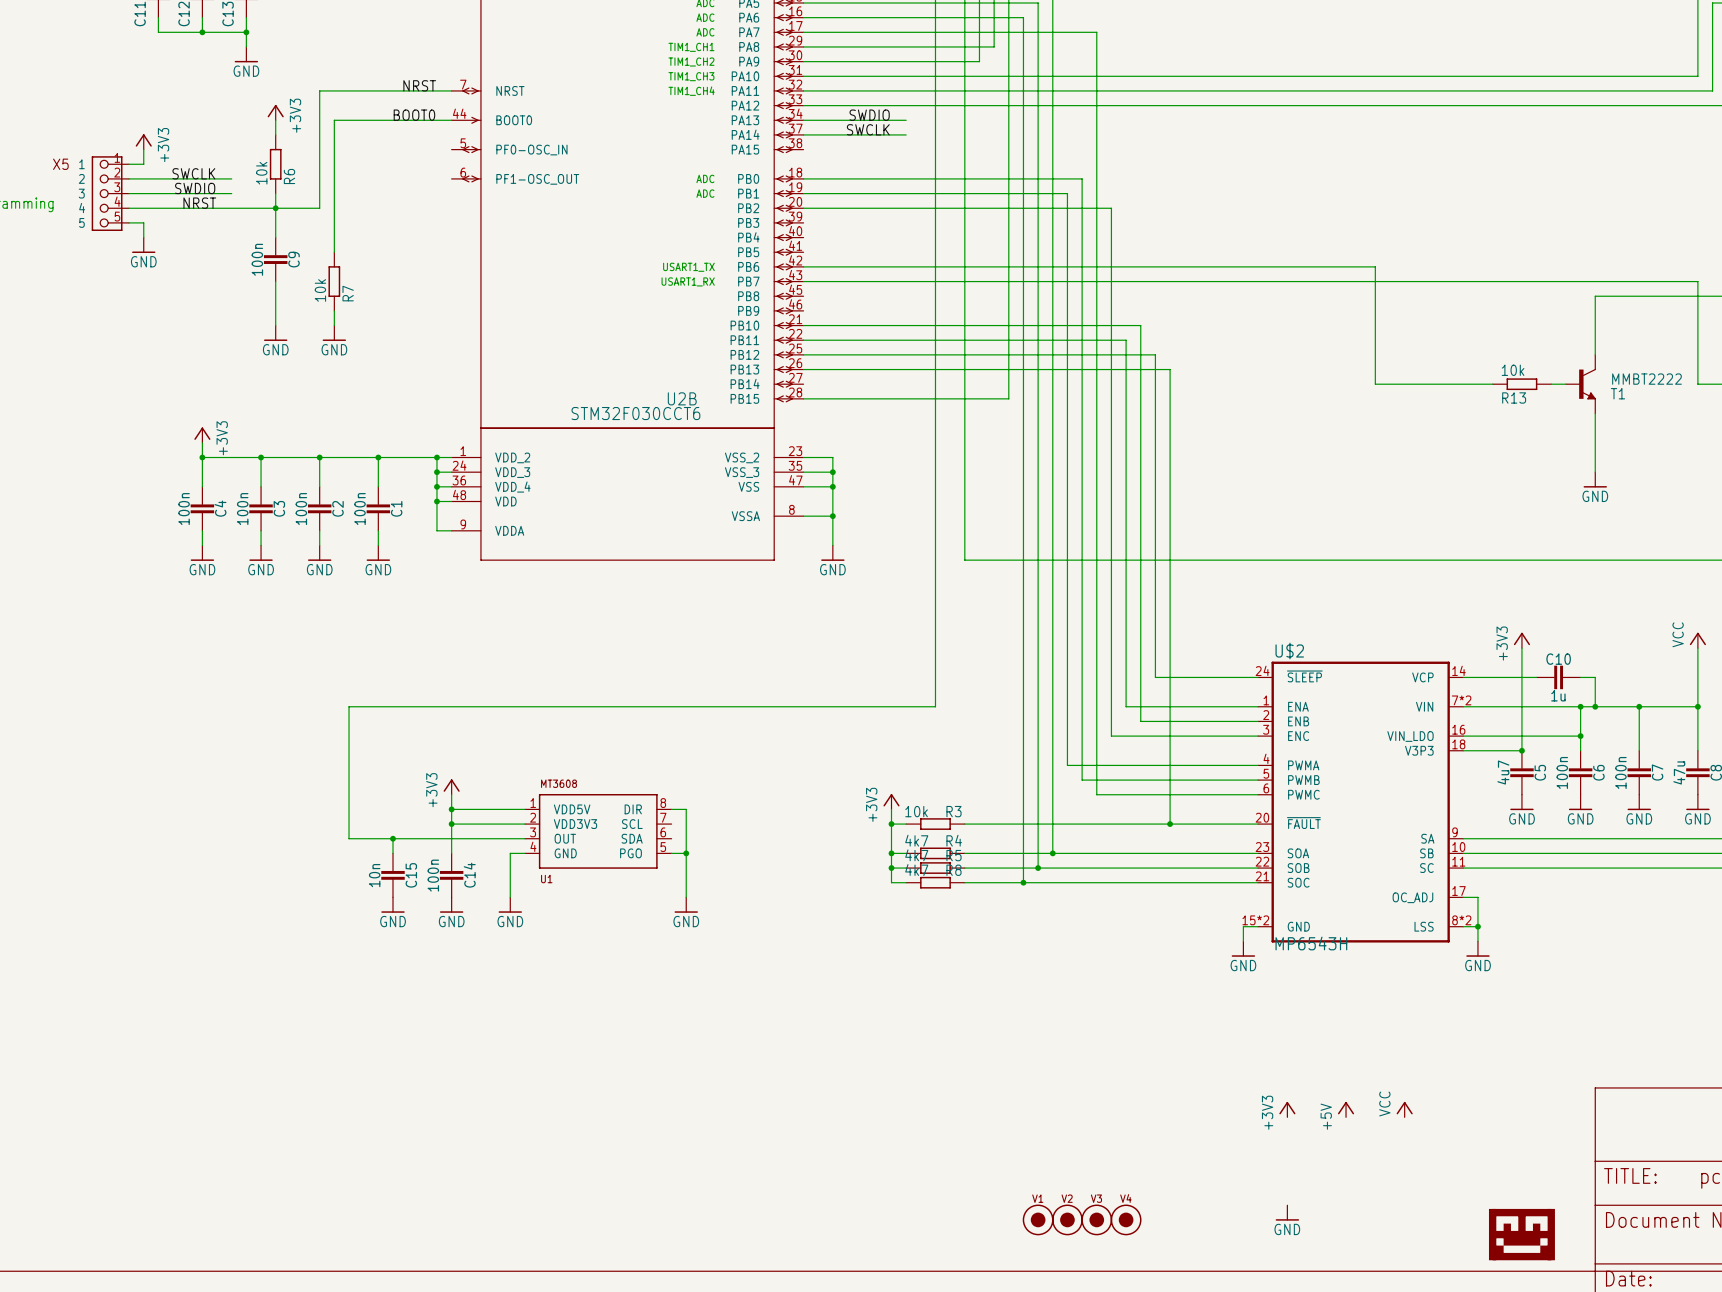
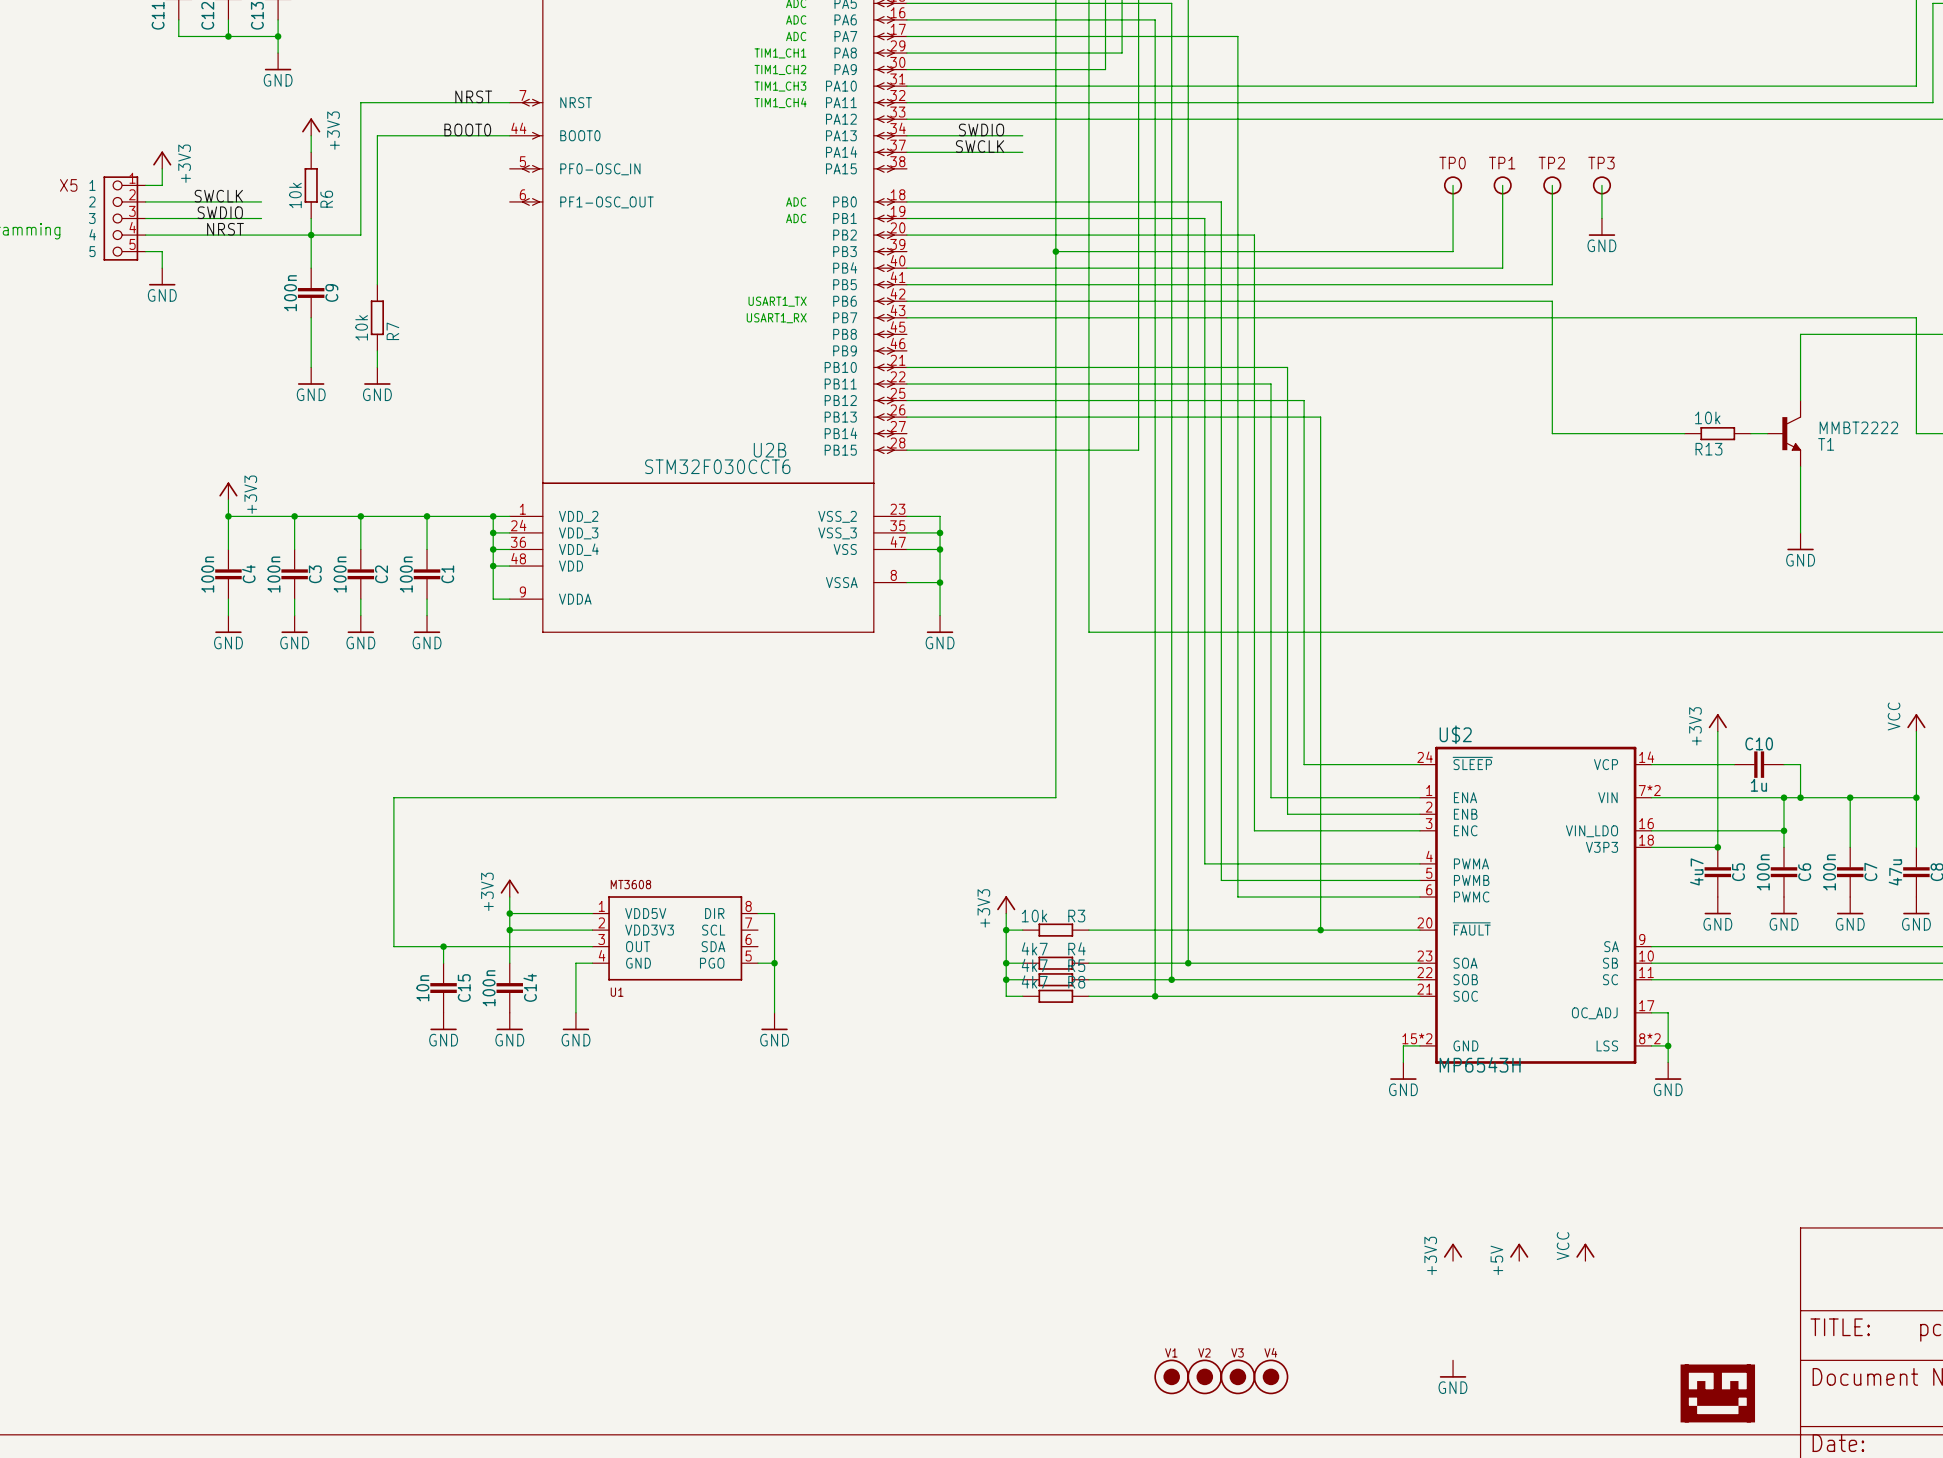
wire: none -> (1453, 185) (1453, 251) (1055, 251)
TP0: none -> (1453, 185)
wire: none -> (1502, 185) (1502, 268) (906, 268)
TP1: none -> (1502, 185)
wire: none -> (1552, 185) (1552, 284) (906, 284)
TP2: none -> (1552, 185)
wire: none -> (1601, 185) (1601, 218)
TP3: none -> (1601, 185)
power symbol: none -> GND (1601, 227)
junction: none -> (1055, 251)

